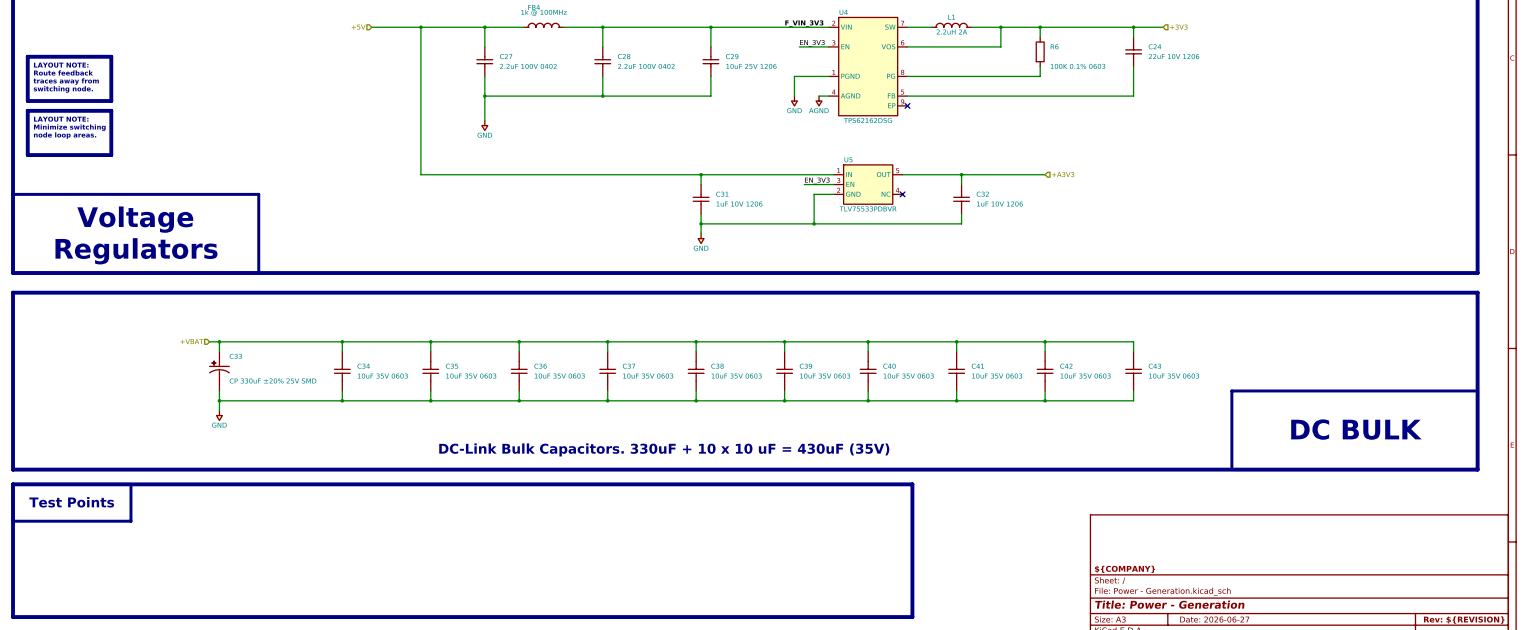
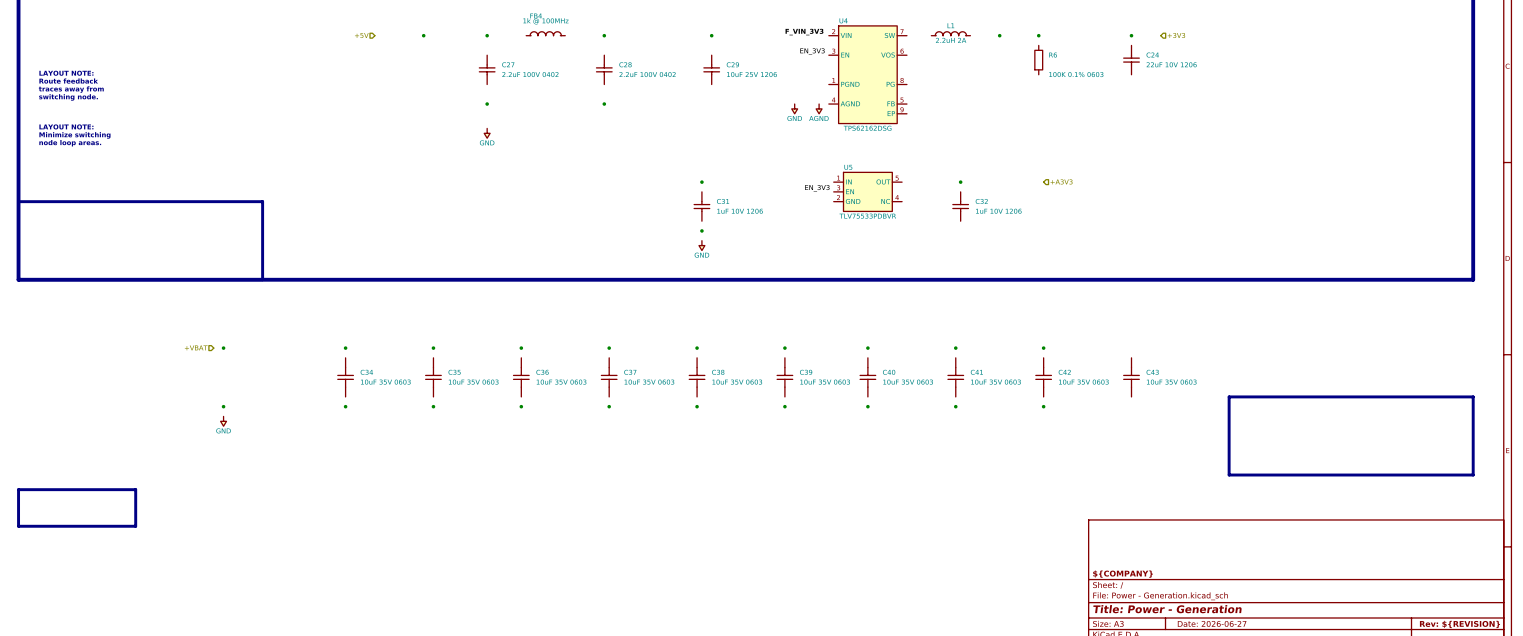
wire: (371, 27) (524, 27) -> none
wire: (420, 27) (420, 174) (833, 174) -> none
wire: (484, 27) (484, 46) -> none
wire: (563, 27) (828, 27) -> none
wire: (602, 27) (602, 46) -> none
wire: (710, 27) (710, 46) -> none
wire: (907, 27) (932, 27) -> none
wire: (971, 27) (1163, 27) -> none
wire: (1000, 27) (1000, 46) (907, 46) -> none
wire: (1040, 27) (1040, 37) -> none
wire: (1133, 27) (1133, 37) -> none
wire: (799, 46) (828, 46) -> none
line: (27, 56) (27, 101) (111, 101) (111, 56) (27, 56) -> none
wire: (1040, 66) (1040, 76) (907, 76) -> none
wire: (1133, 66) (1133, 96) (907, 96) -> none
wire: (484, 76) (484, 120) -> none
wire: (602, 76) (602, 96) -> none
wire: (710, 76) (710, 96) (484, 96) -> none
wire: (828, 76) (794, 76) (794, 96) -> none
wire: (819, 96) (828, 96) -> none
no-connect mark: (907, 105) -> none
line: (27, 110) (111, 110) (111, 155) (27, 155) (27, 110) -> none
wire: (701, 174) (701, 184) -> none
wire: (902, 174) (1045, 174) -> none
wire: (961, 174) (961, 184) -> none
wire: (804, 184) (833, 184) -> none
wire: (833, 194) (814, 194) (814, 223) -> none
no-connect mark: (902, 194) -> none
wire: (701, 214) (701, 233) -> none
wire: (961, 214) (961, 223) (701, 223) -> none
text: Voltage (135, 219) -> none
junction: (814, 223) -> none
text: Regulators (136, 251) -> none
line: (13, 292) (13, 469) (1477, 469) (1477, 292) (13, 292) -> none
wire: (209, 341) (1133, 341) (1133, 351) -> none
wire: (219, 341) (219, 351) -> none
wire: (342, 341) (342, 351) -> none
wire: (430, 341) (430, 351) -> none
wire: (519, 341) (519, 351) -> none
wire: (607, 341) (607, 351) -> none
wire: (696, 341) (696, 351) -> none
wire: (784, 341) (784, 351) -> none
wire: (868, 341) (868, 351) -> none
wire: (956, 341) (956, 351) -> none
wire: (1045, 341) (1045, 351) -> none
part: (219, 371) -> none
wire: (219, 390) (219, 410) -> none
wire: (342, 390) (342, 400) -> none
wire: (430, 390) (430, 400) -> none
wire: (519, 390) (519, 400) -> none
wire: (607, 390) (607, 400) -> none
wire: (696, 390) (696, 400) -> none
wire: (784, 390) (784, 400) -> none
wire: (868, 390) (868, 400) -> none
wire: (956, 390) (956, 400) -> none
wire: (1045, 390) (1045, 400) -> none
wire: (1133, 390) (1133, 400) (219, 400) -> none
text: DC BULK (1356, 429) -> none
text: DC-Link Bulk Capacitors. 330uF + 10 x 10 uF = 430uF (35V) (664, 449) -> none
line: (13, 484) (13, 617) (912, 617) (912, 484) (13, 484) -> none
text: Test Points (71, 502) -> none

